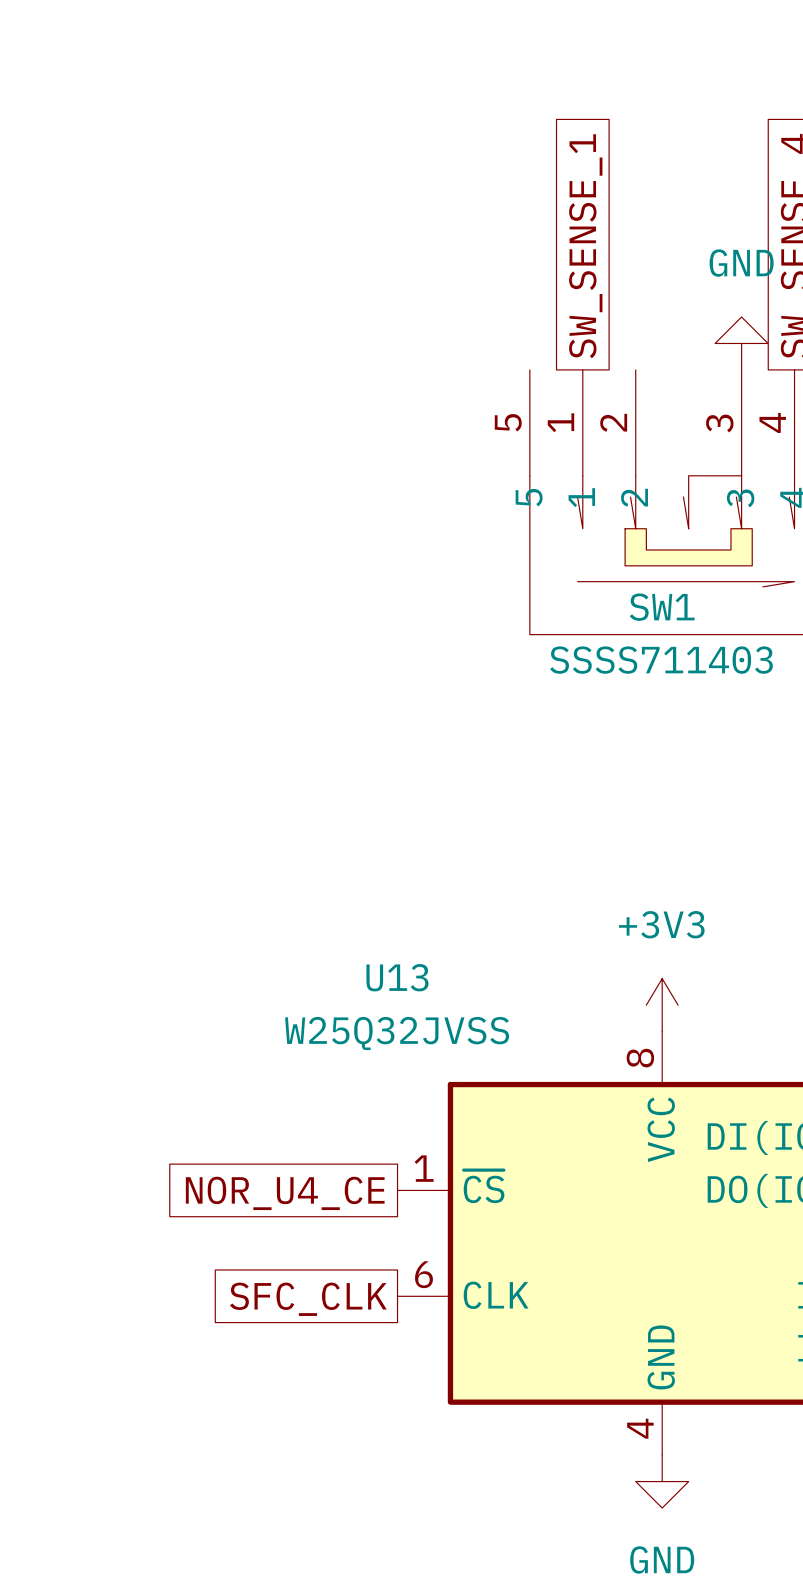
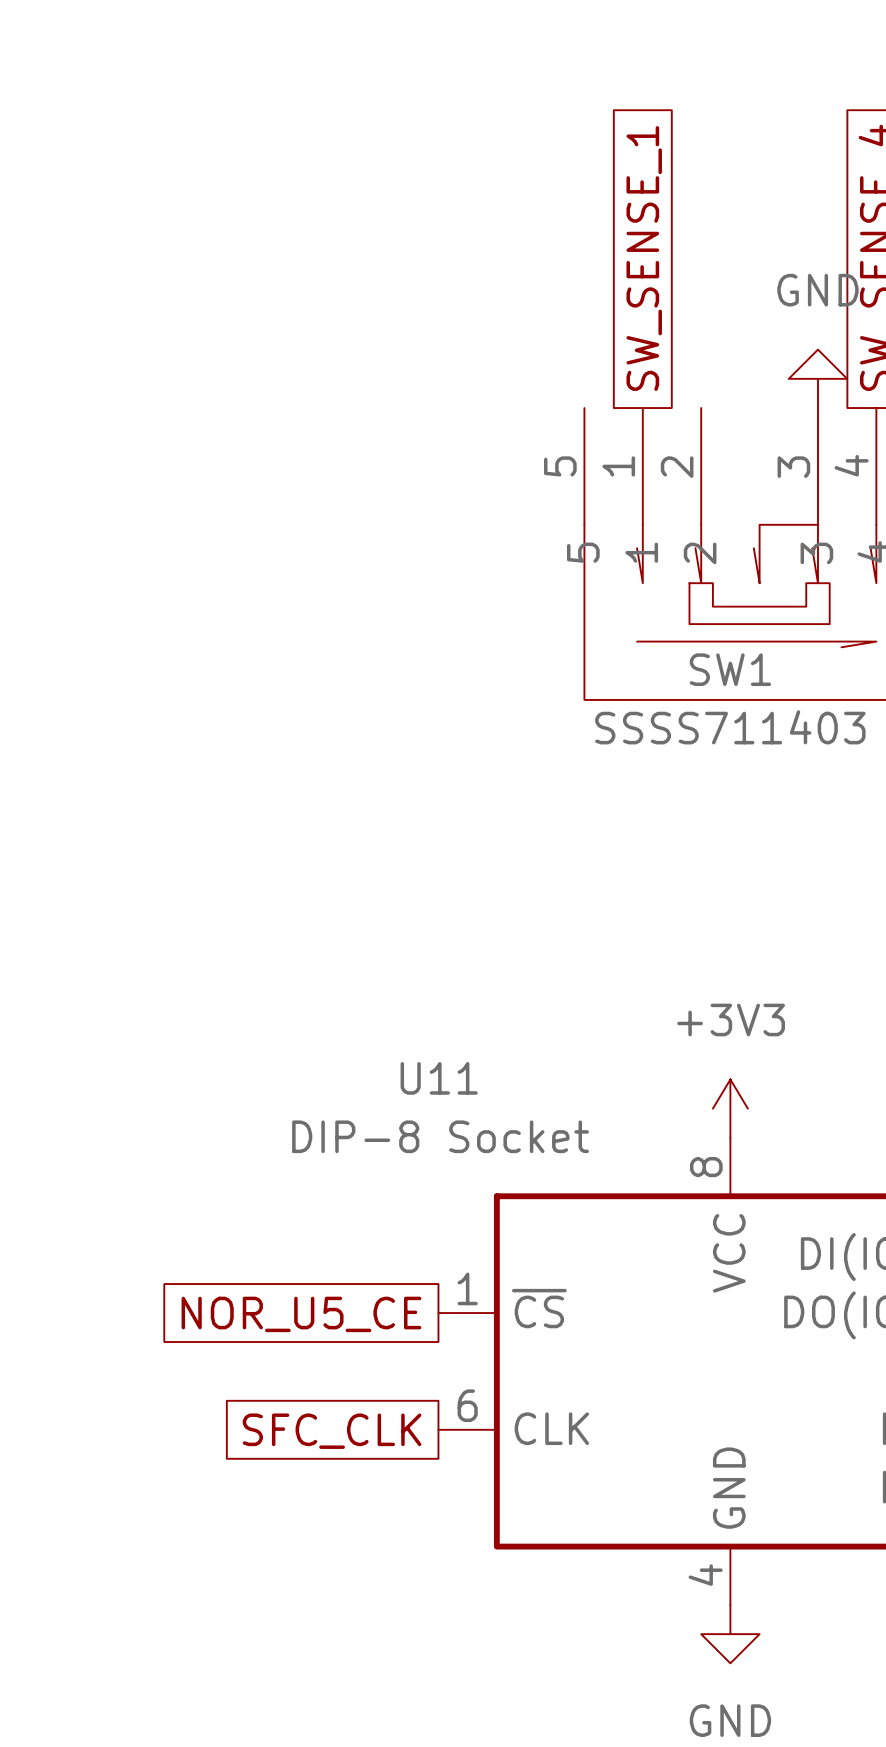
U13 name: U13 (397, 977) -> U11 (439, 1078)
U13 value: W25Q32JVSS (397, 1033) -> DIP-8 Socket (440, 1136)
global label: NOR_U4_CE (285, 1193) -> NOR_U5_CE (301, 1314)

